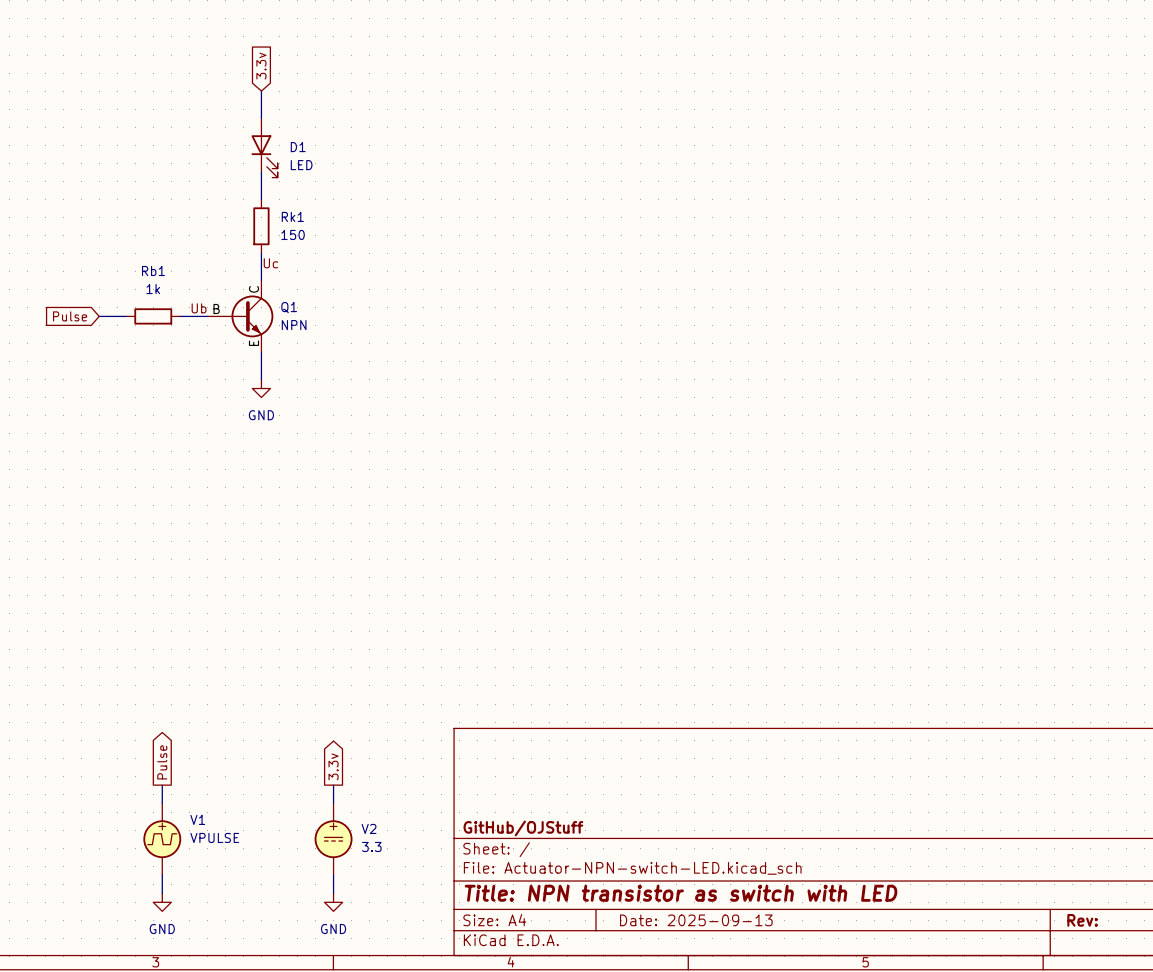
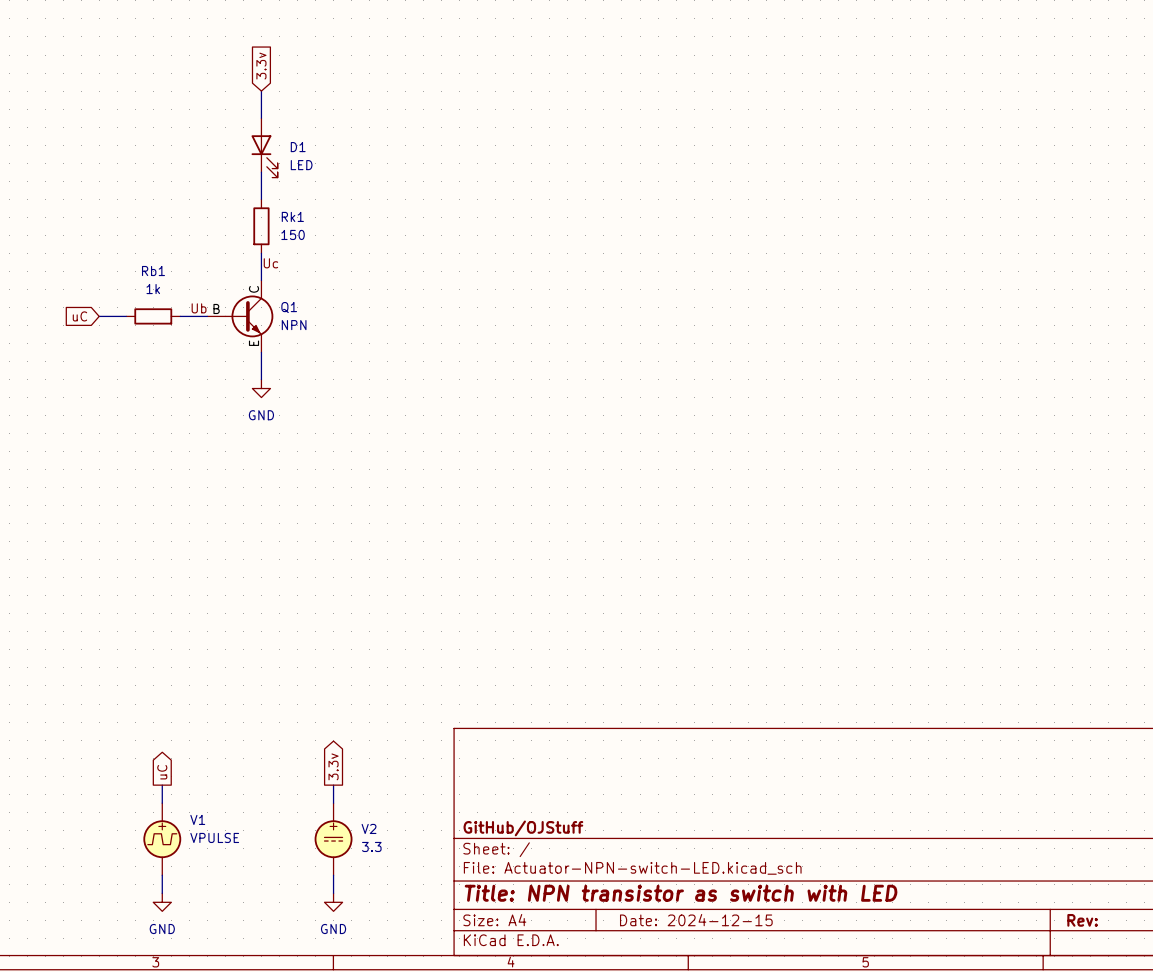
global label: Pulse (70, 316) -> uC (79, 316)
global label: Pulse (162, 762) -> uC (162, 772)
title block: Date: 2025-09-13 (696, 920) -> Date: 2024-12-15 (696, 920)

